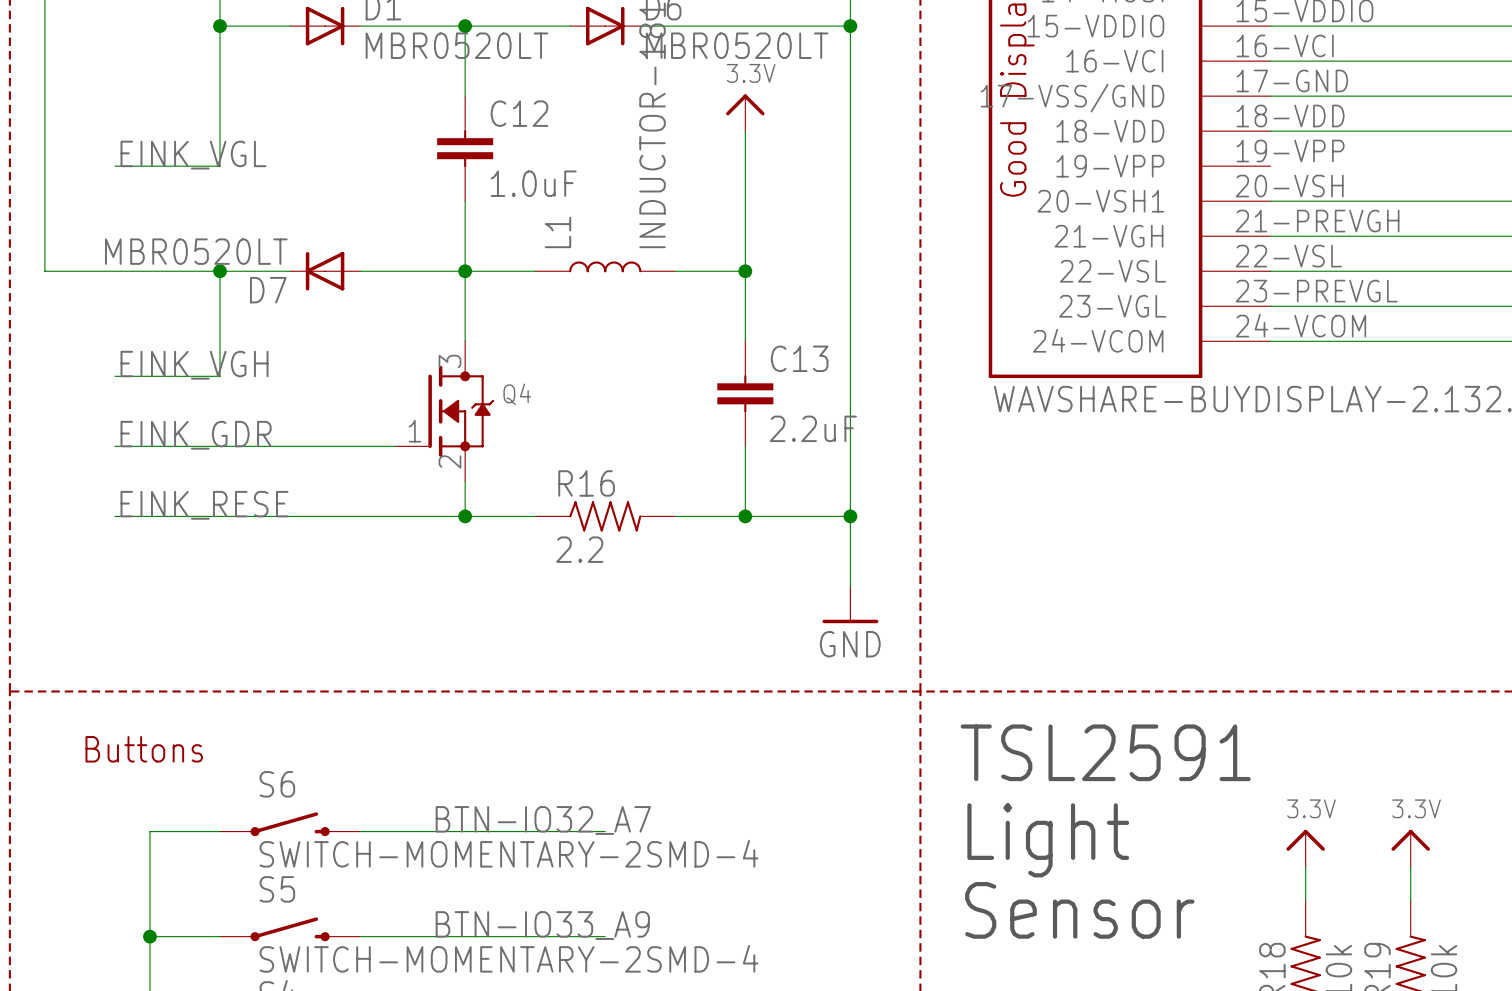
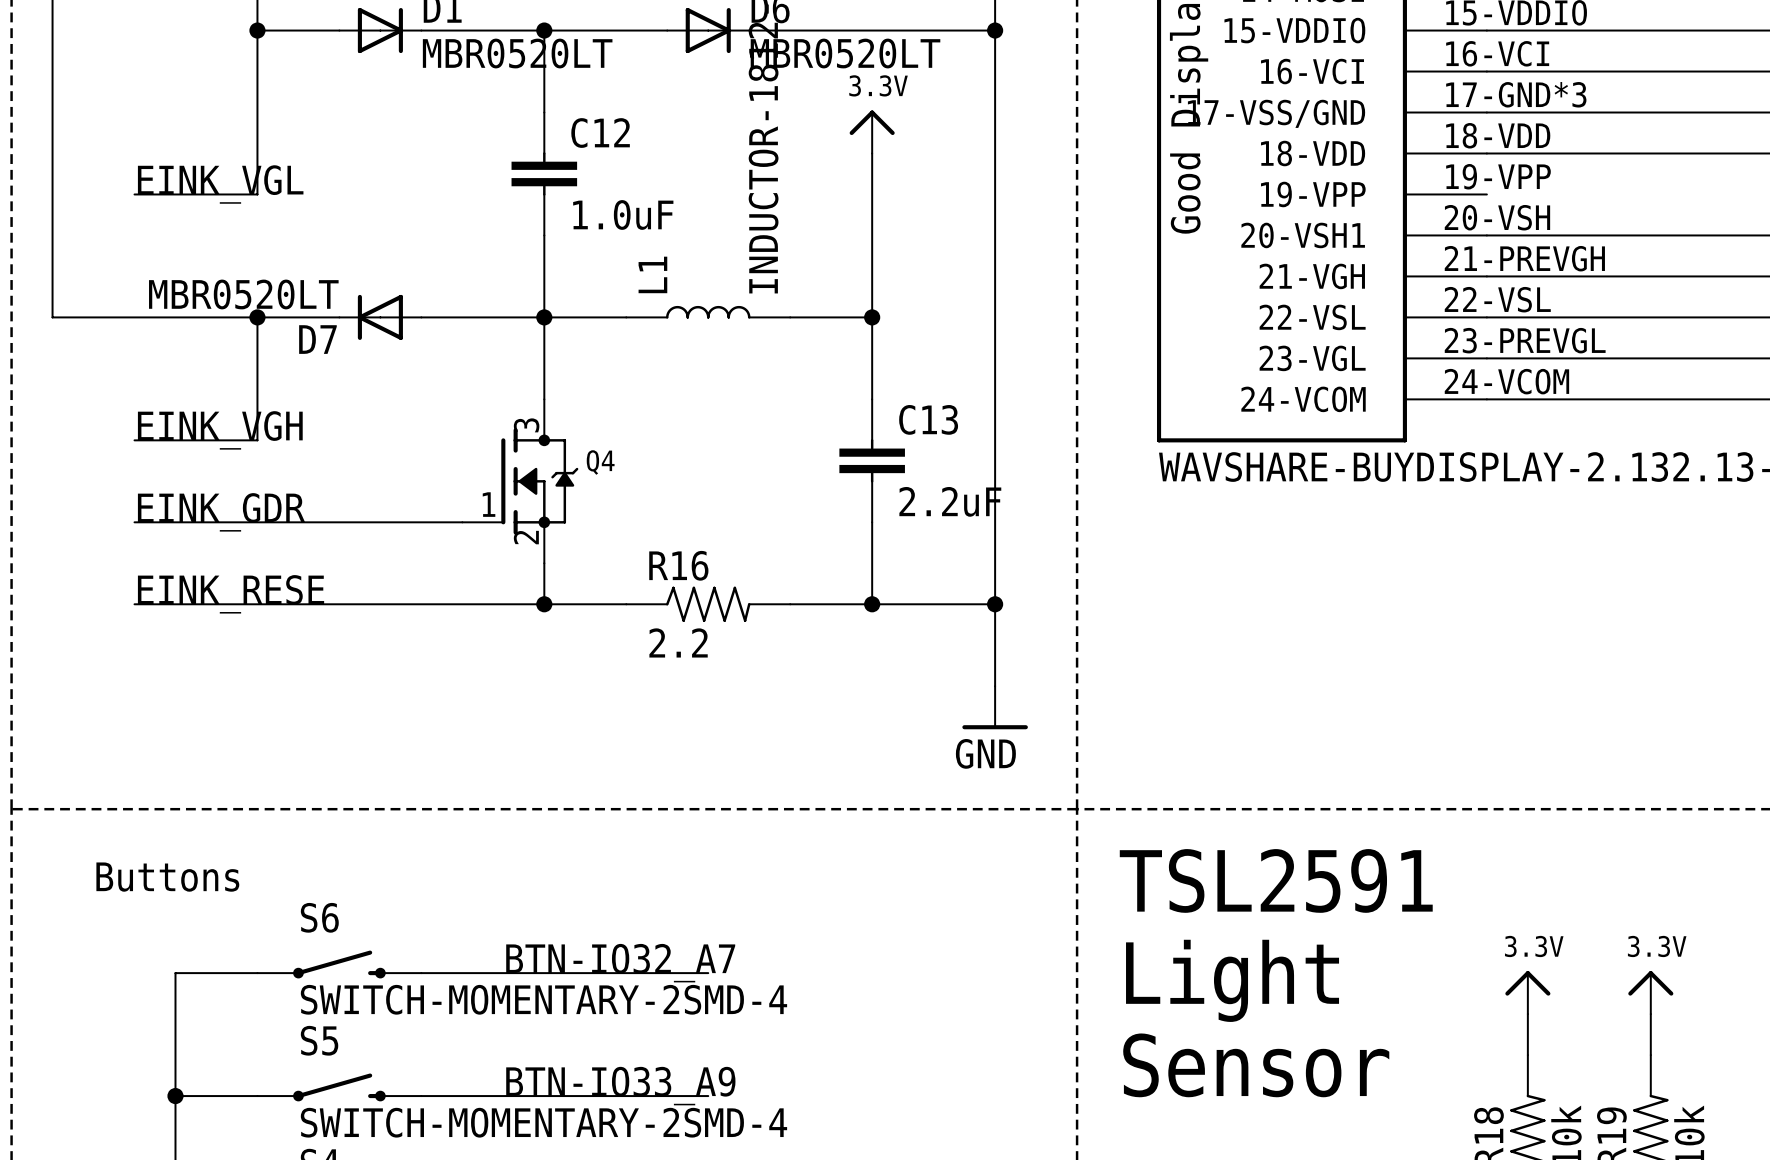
part pin number: 17-GND (1292, 80) -> 17-GND*3 (1516, 94)

